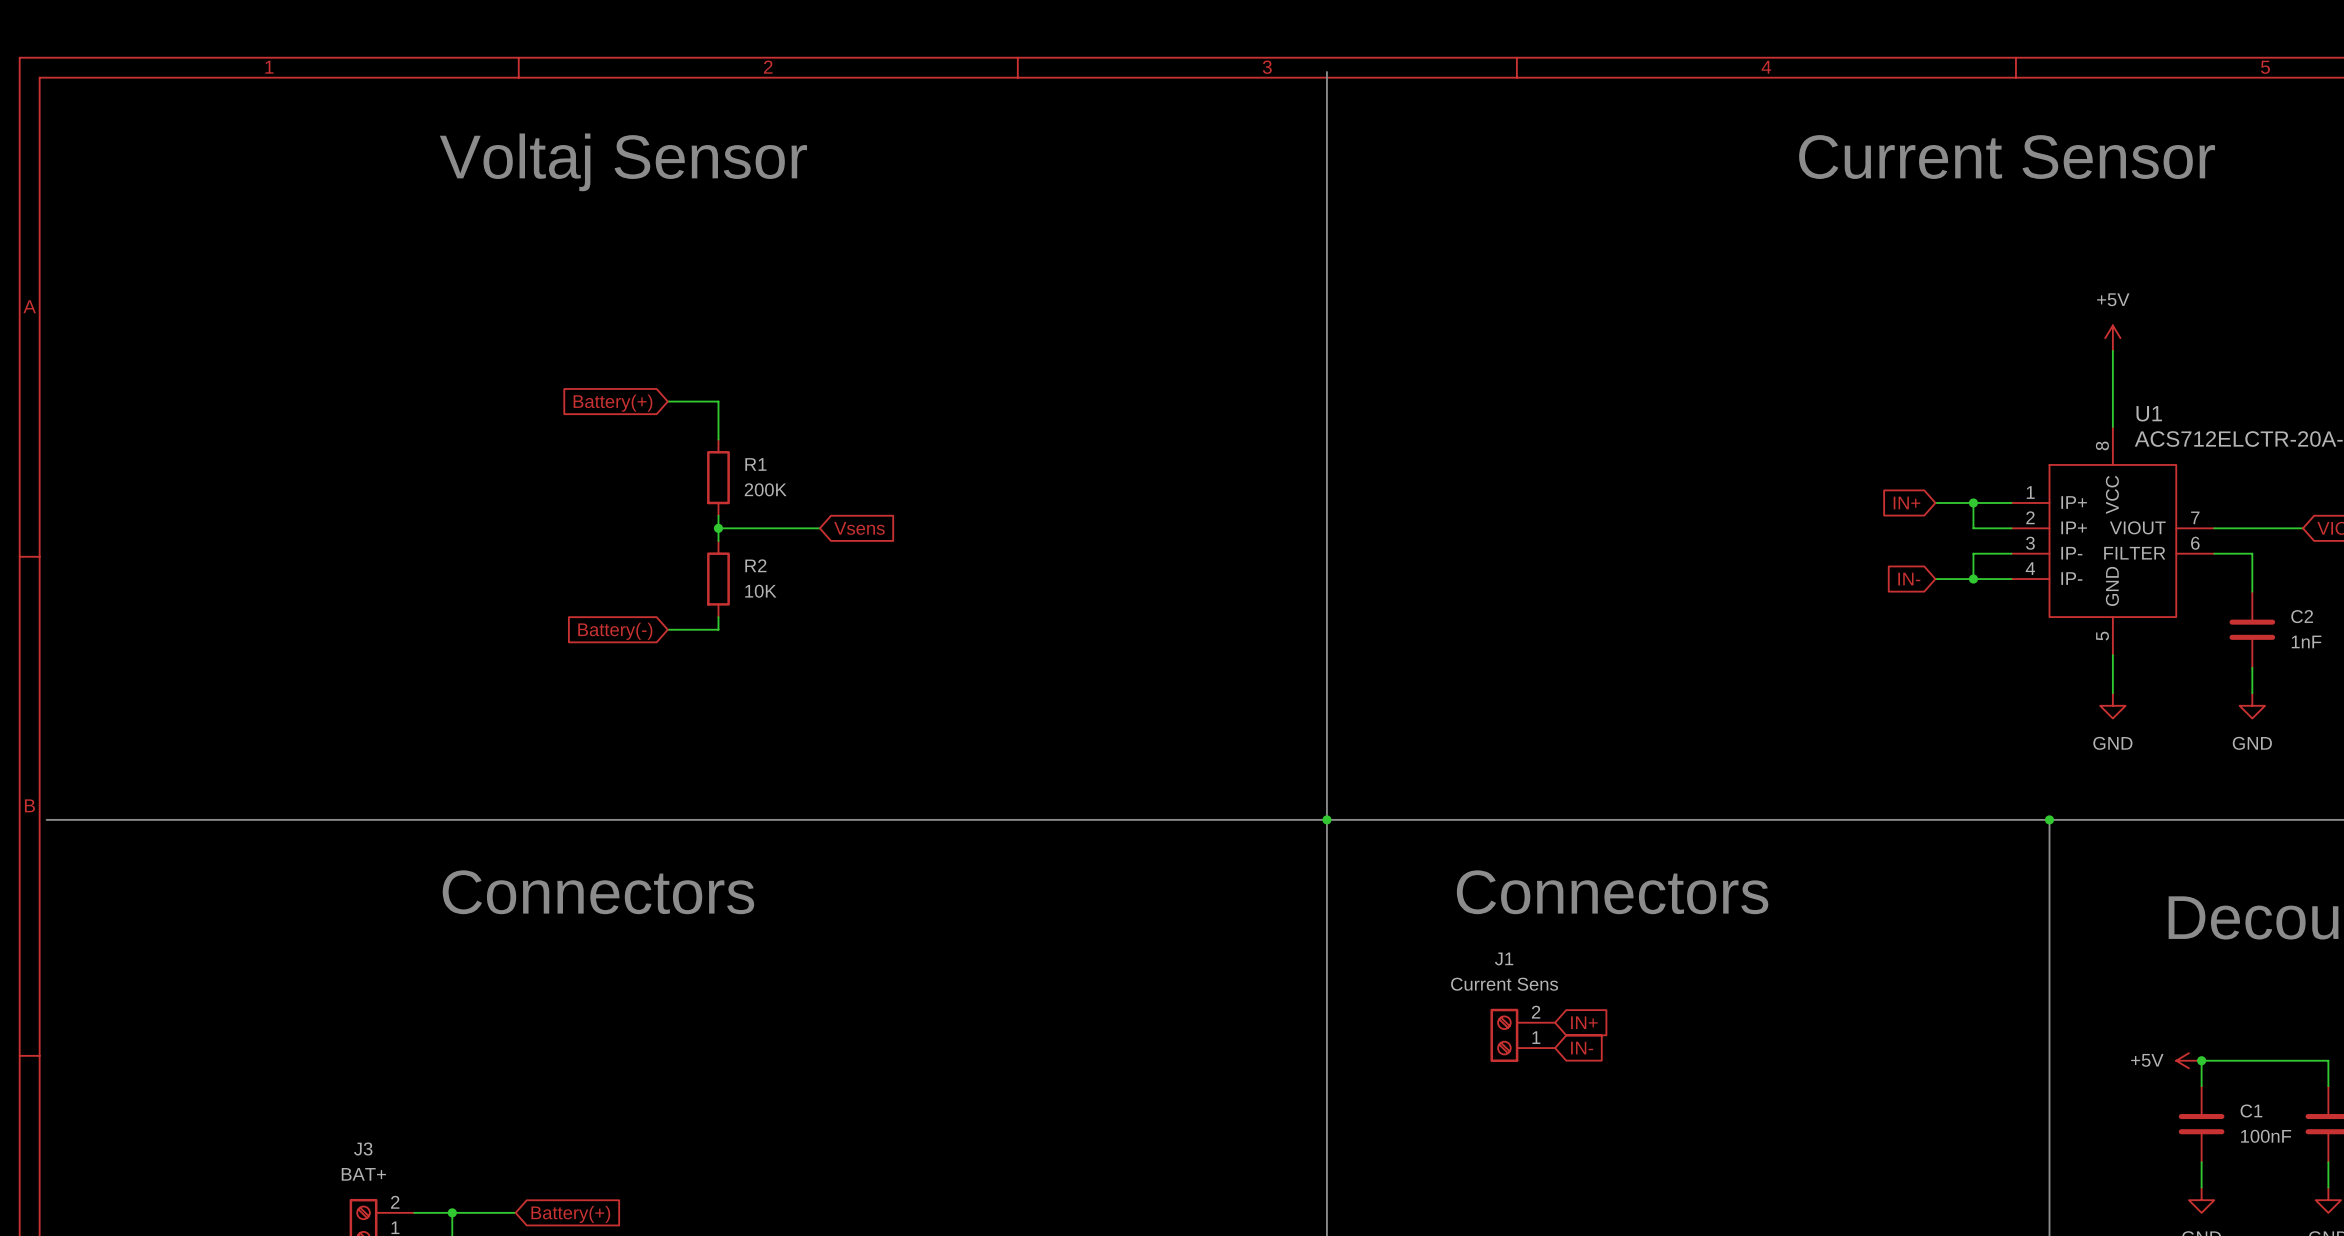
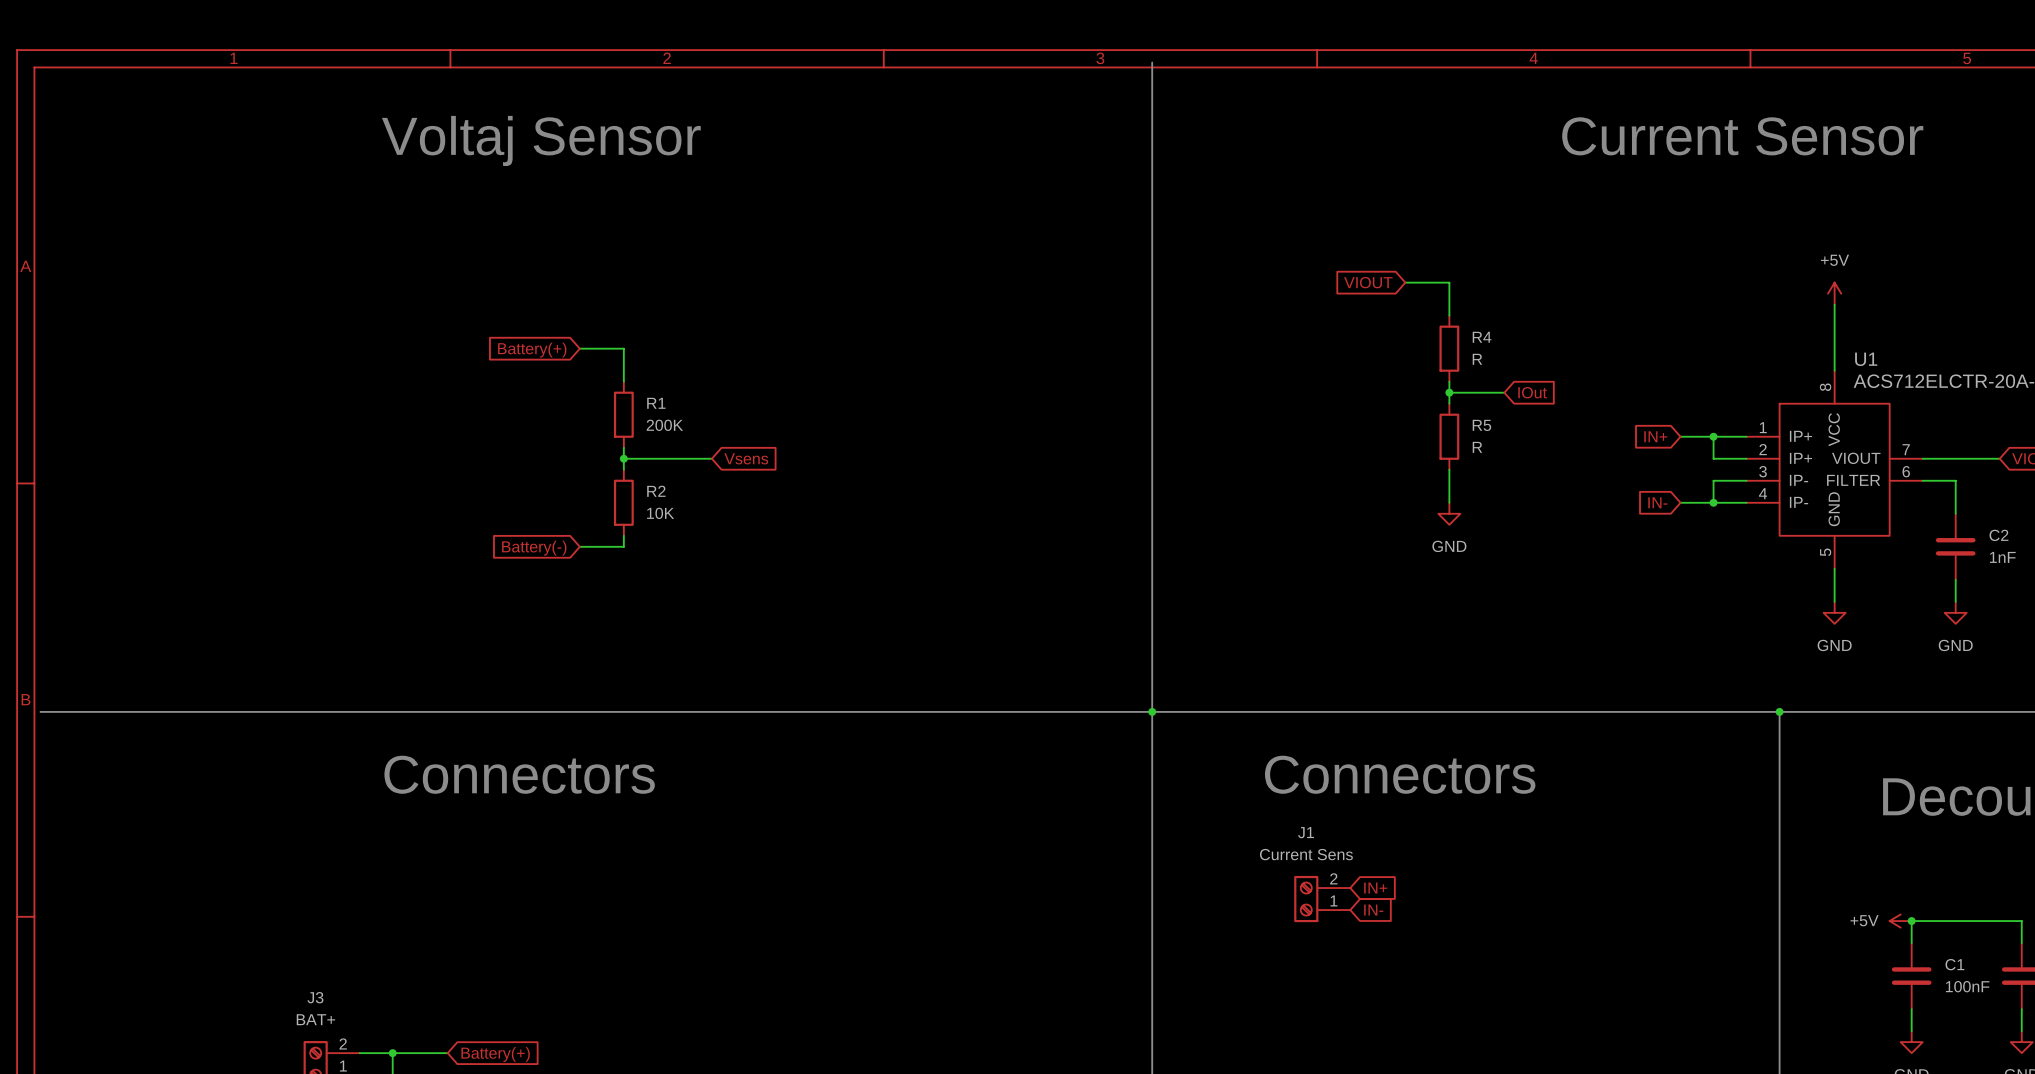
global label: none -> VIOUT (1368, 282)
wire: none -> (1405, 282) (1449, 282) (1449, 315)
R4: none -> R (1449, 348)
wire: none -> (1449, 381) (1449, 403)
wire: none -> (1449, 392) (1504, 392)
junction: none -> (1449, 392)
global label: none -> IOut (1532, 392)
R5: none -> R (1449, 436)
wire: none -> (1449, 469) (1449, 502)
power symbol: none -> GND (1449, 513)

